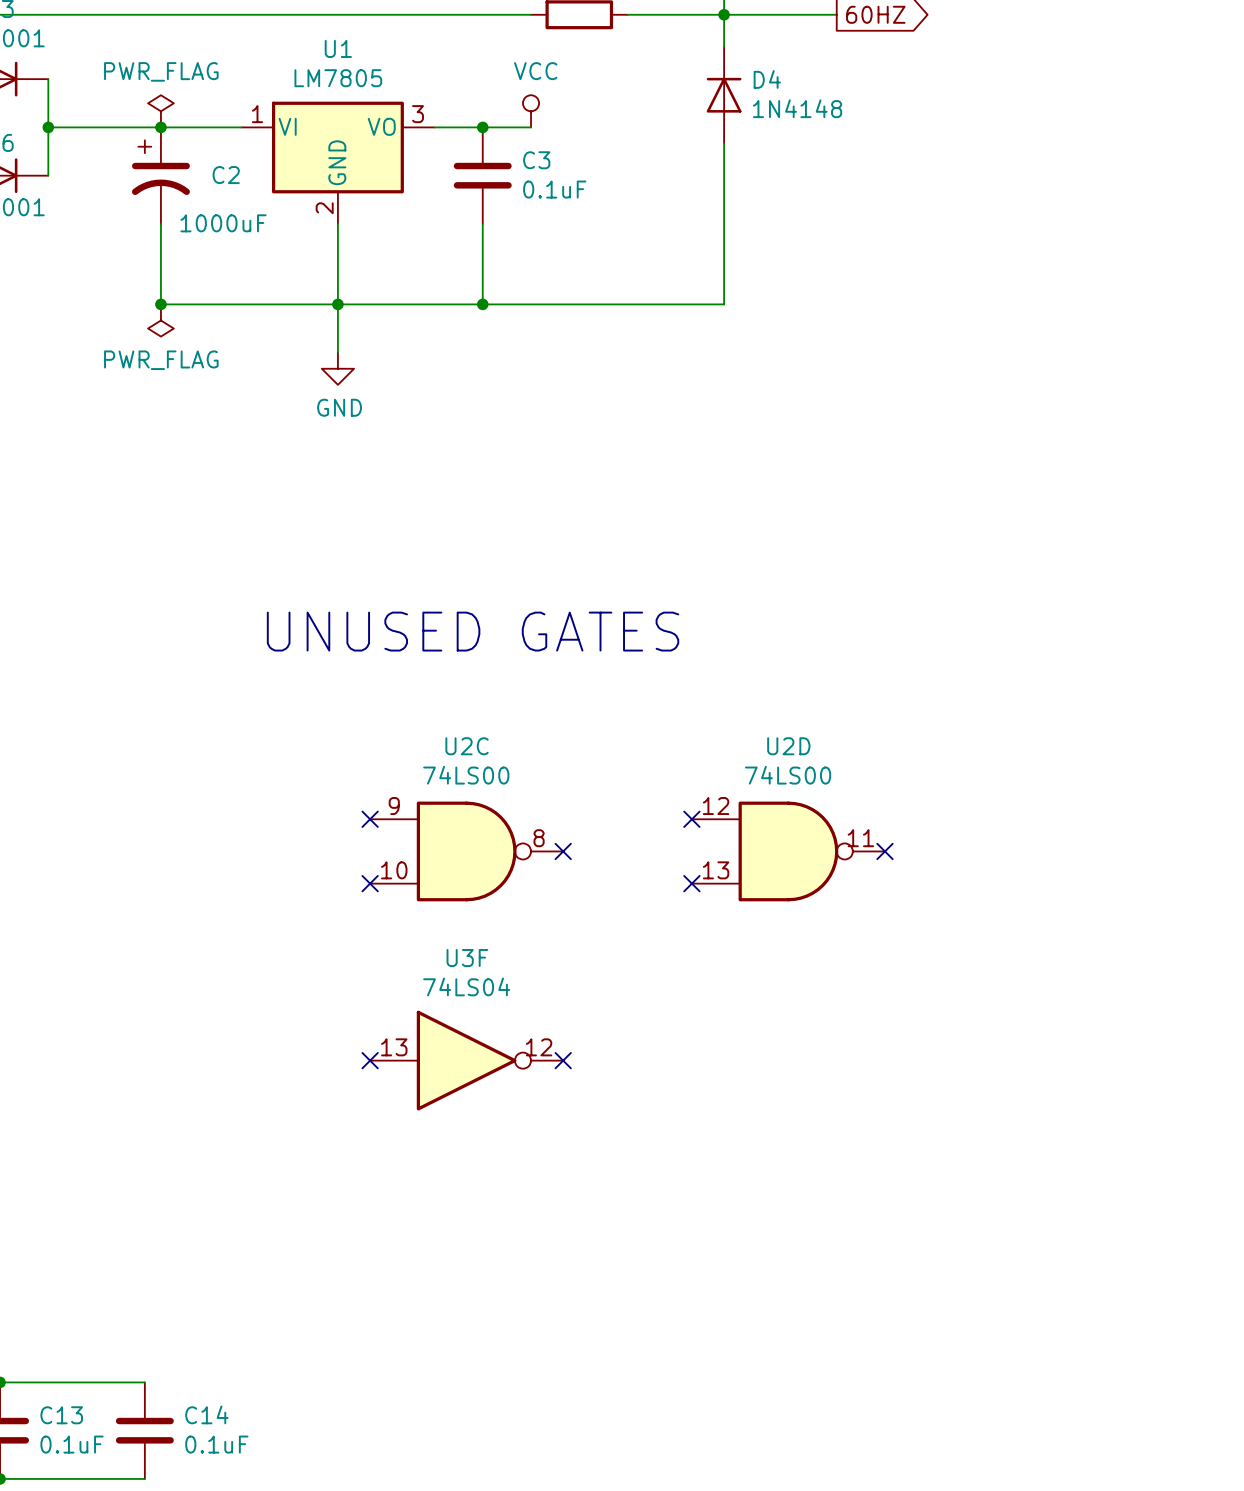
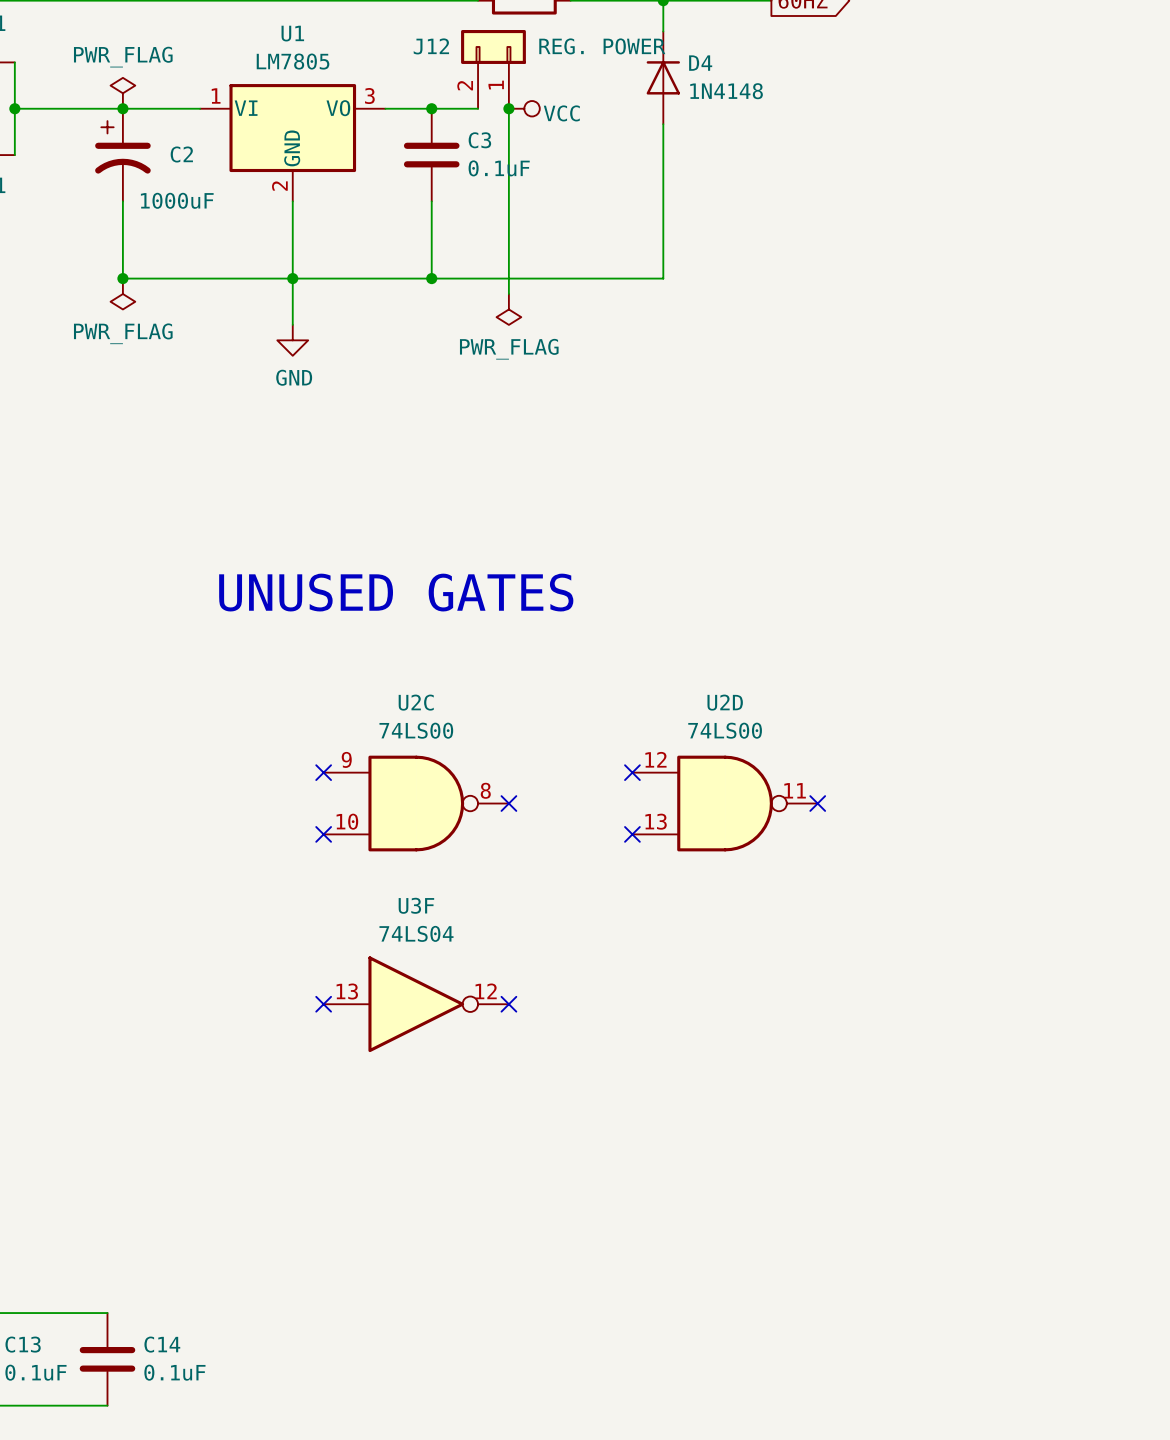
J12: none -> REG. POWER (493, 69)
power symbol rotation: 0° (531, 111) -> 90° clockwise (524, 108)
power symbol position: VCC (531, 111) -> VCC (524, 108)
wire: none -> (508, 108) (508, 294)
junction: none -> (508, 108)
power symbol: none -> PWR_FLAG (508, 309)

